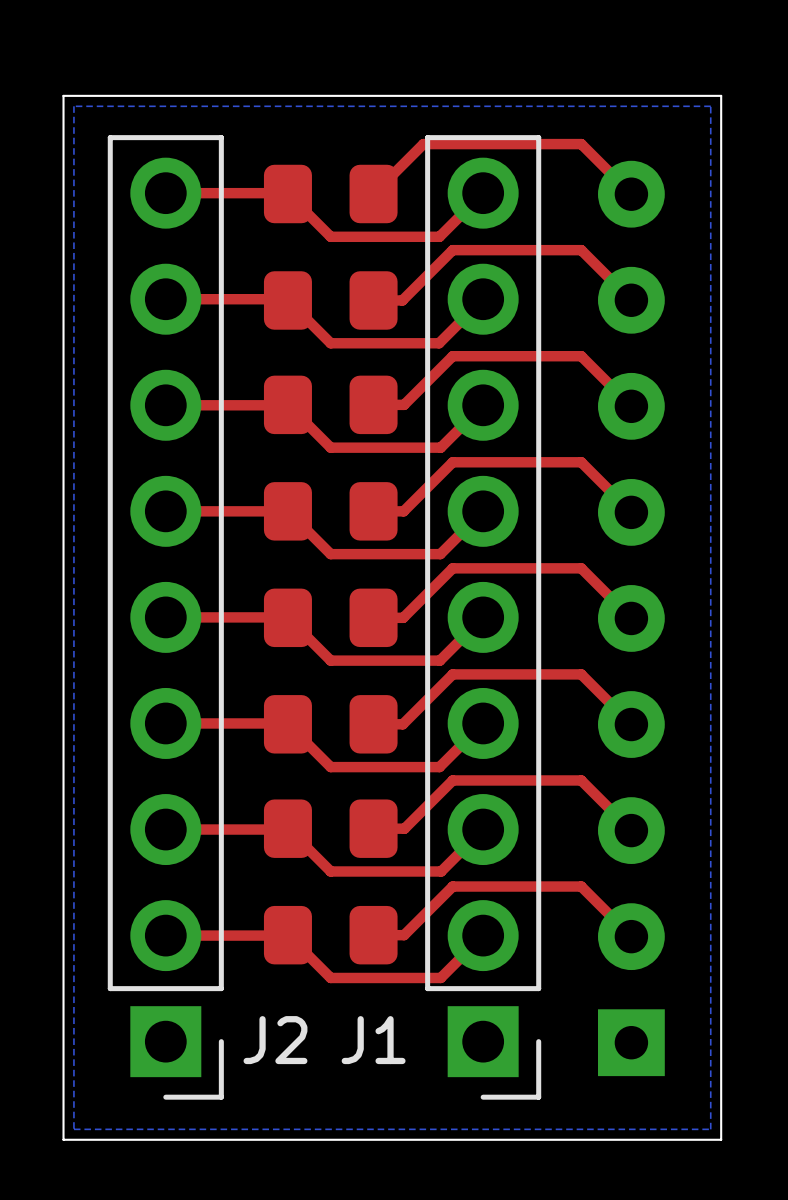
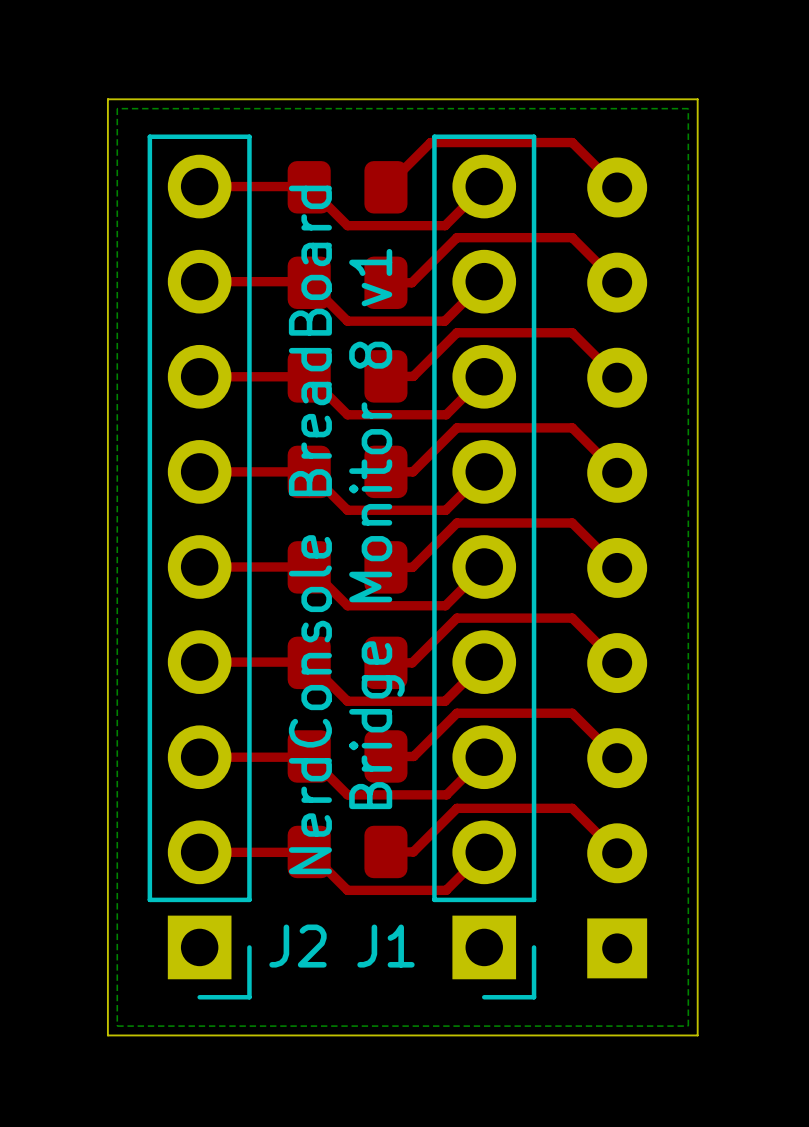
text: none -> Bridge Monitor 8 v1 (376, 529)
text: none -> NerdConsole BreadBoard (310, 529)

